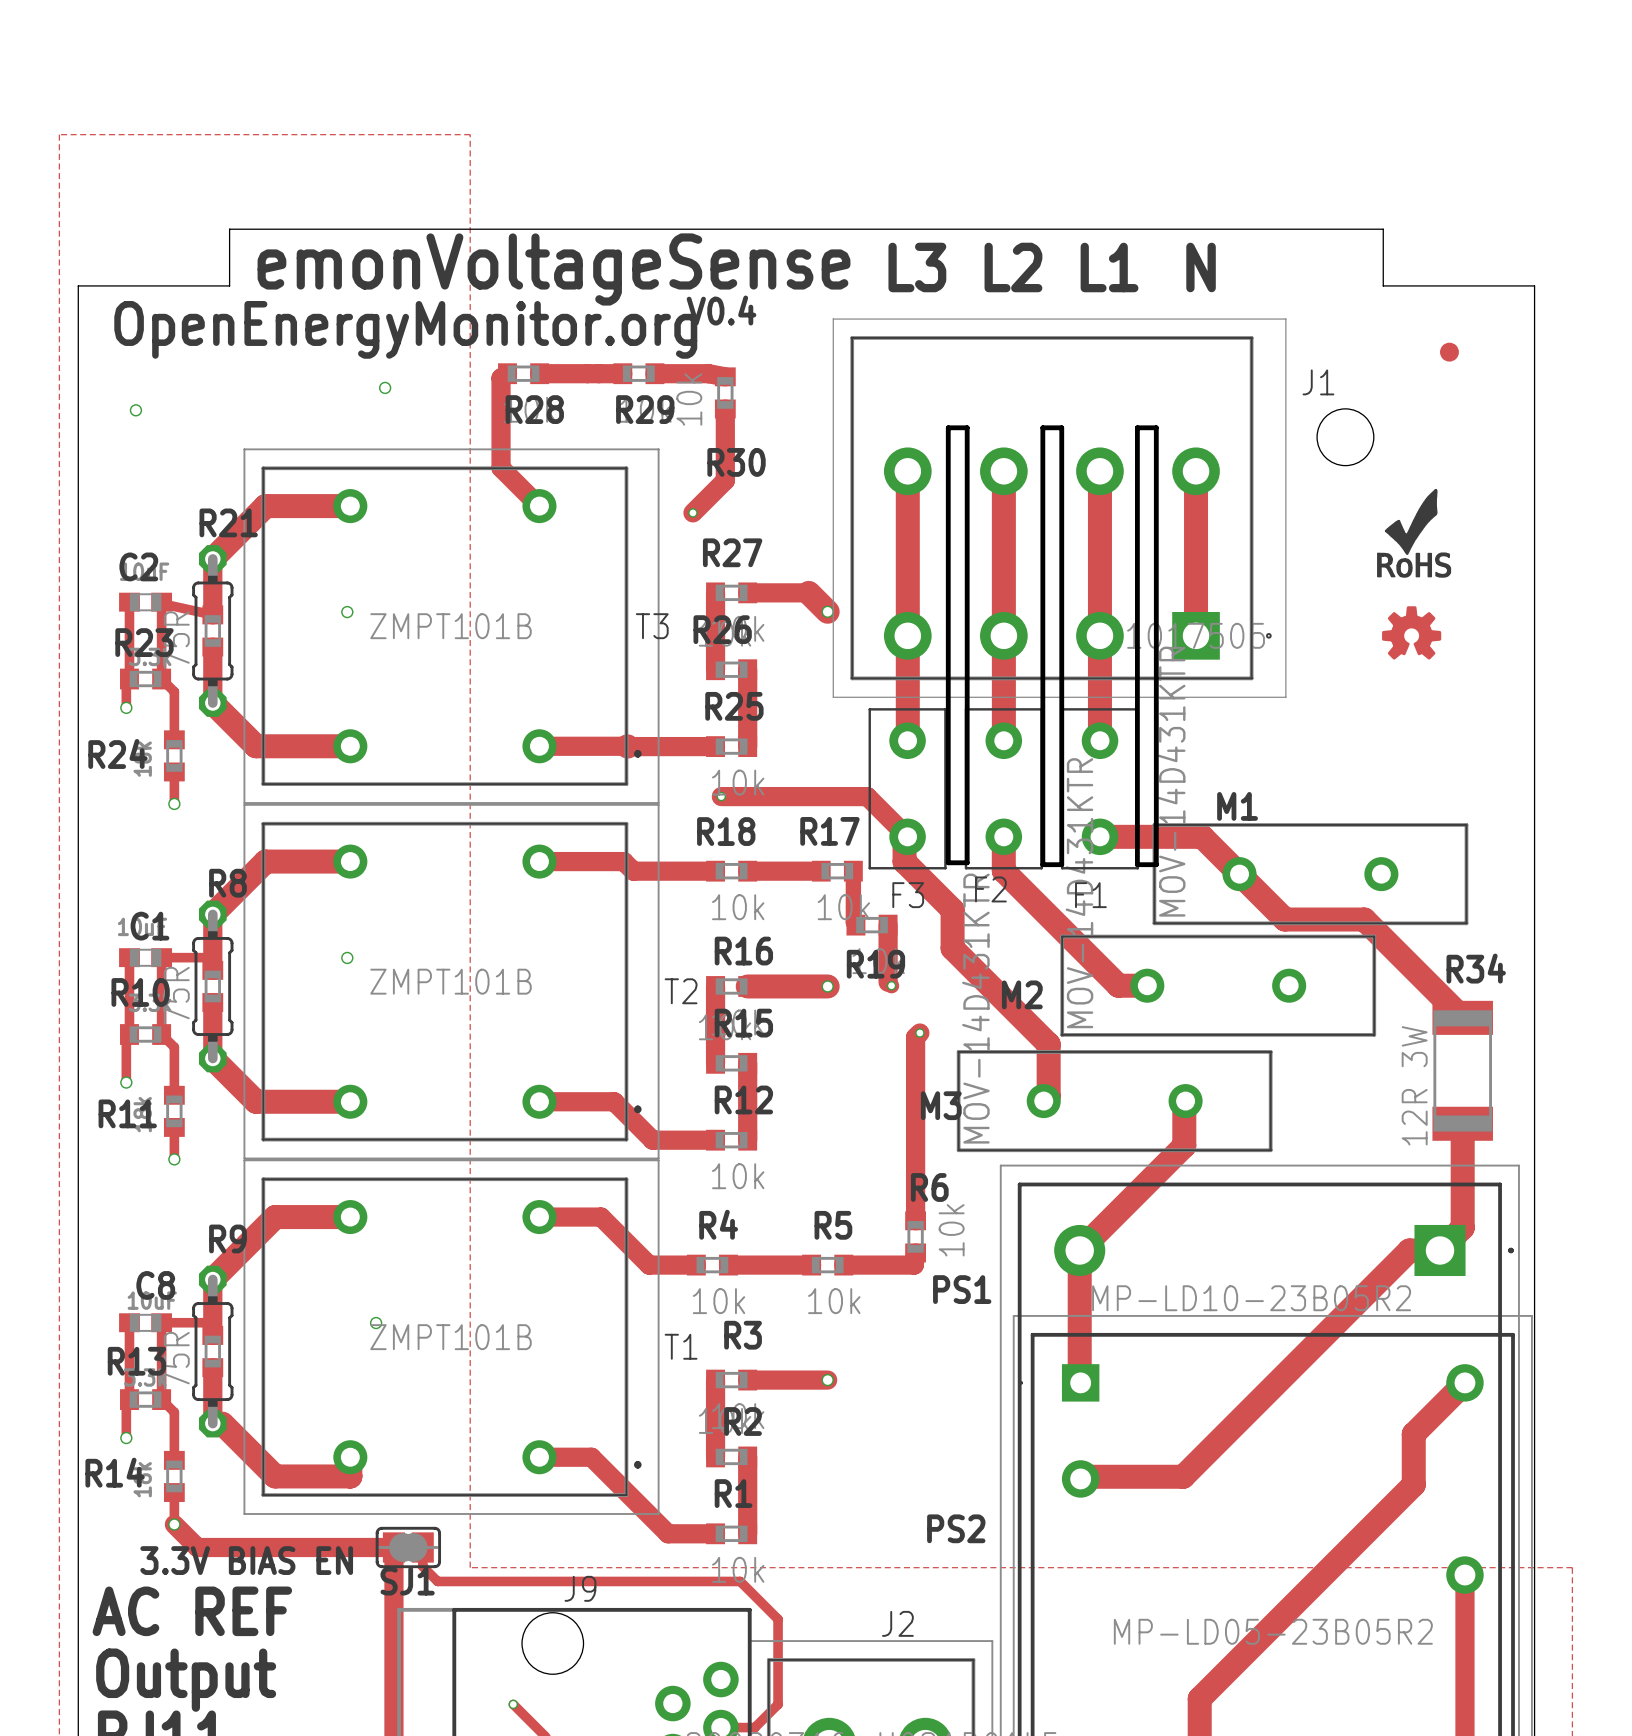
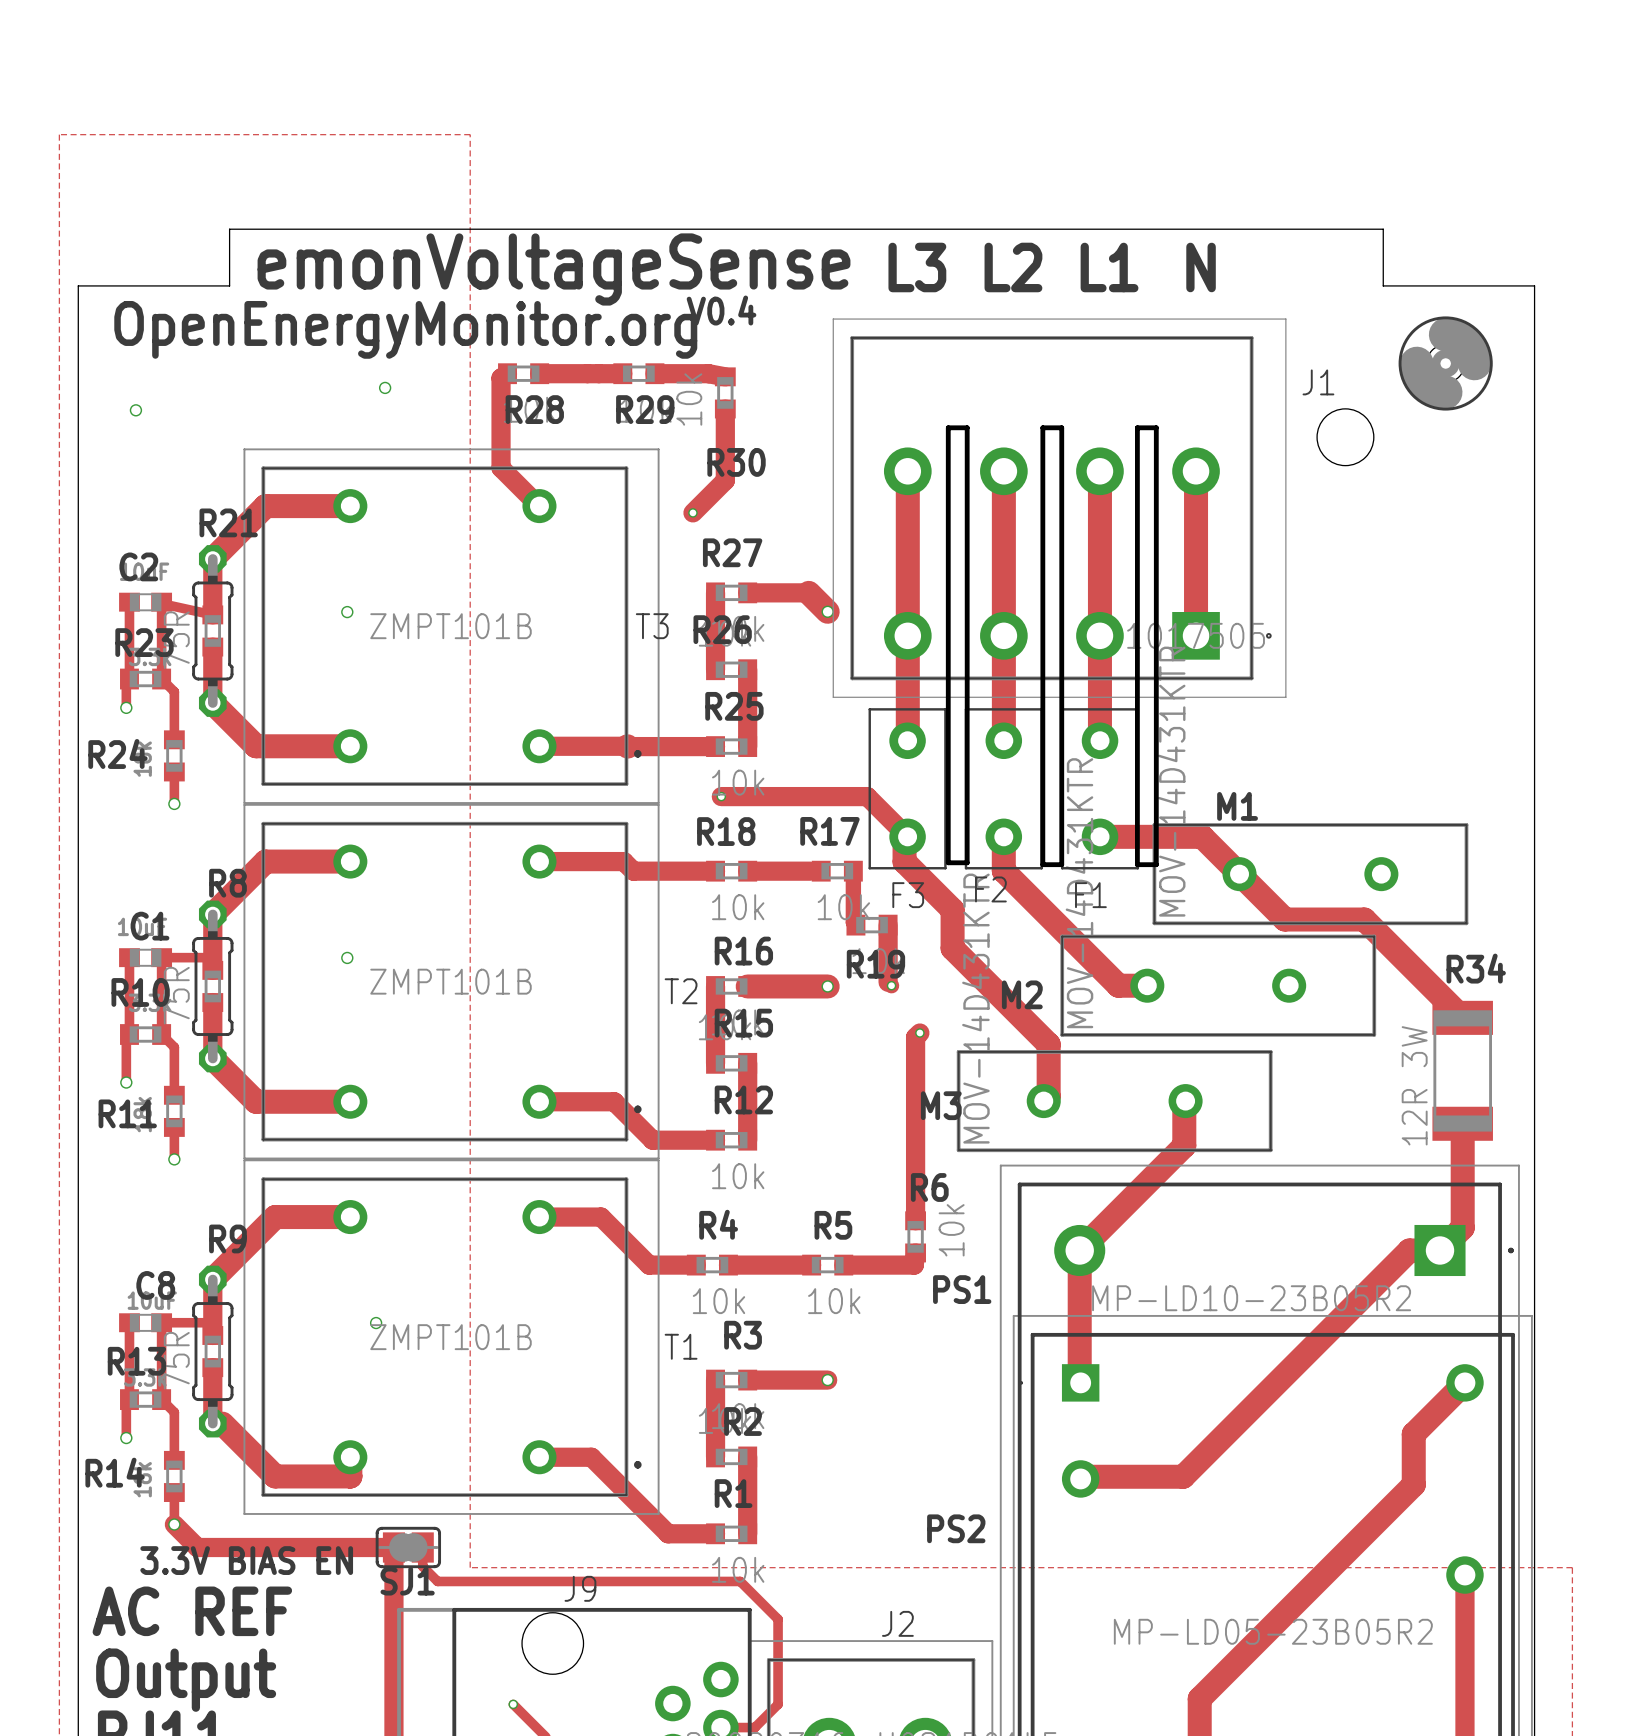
part footprint: [1440, 342, 1459, 362] -> [1398, 316, 1493, 411]
drawing: [1377, 489, 1452, 578] -> none
drawing: [1382, 606, 1442, 660] -> none

